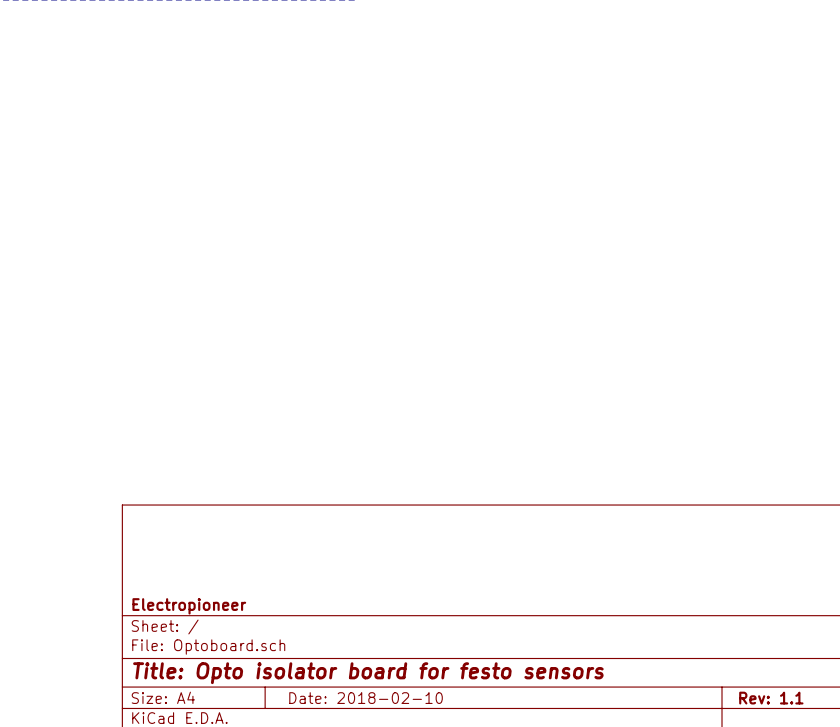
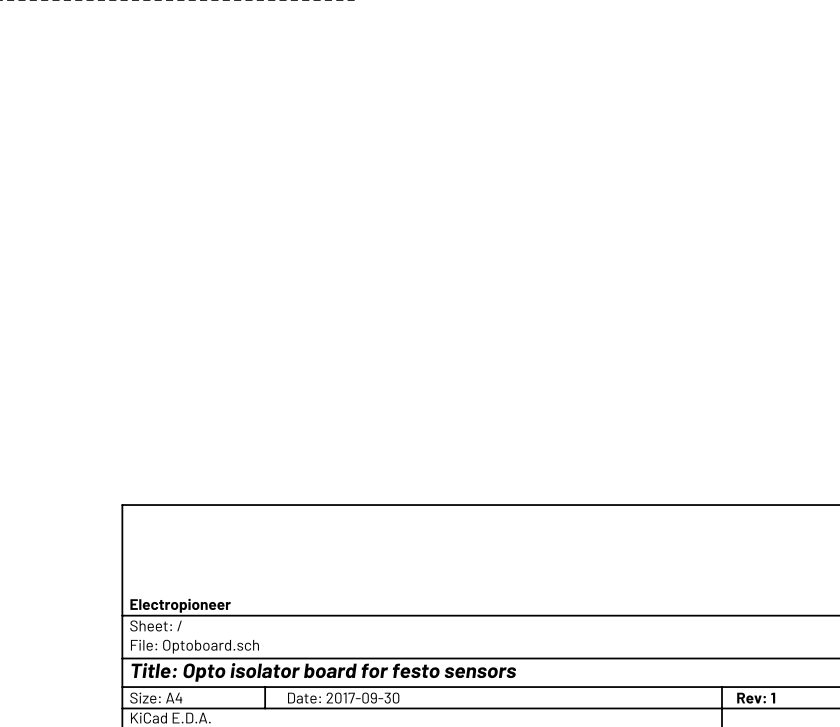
title block: Date: 2018-02-10 (366, 698) -> Date: 2017-09-30 (343, 698)
title block: Rev: 1.1 (771, 698) -> Rev: 1 (756, 698)

